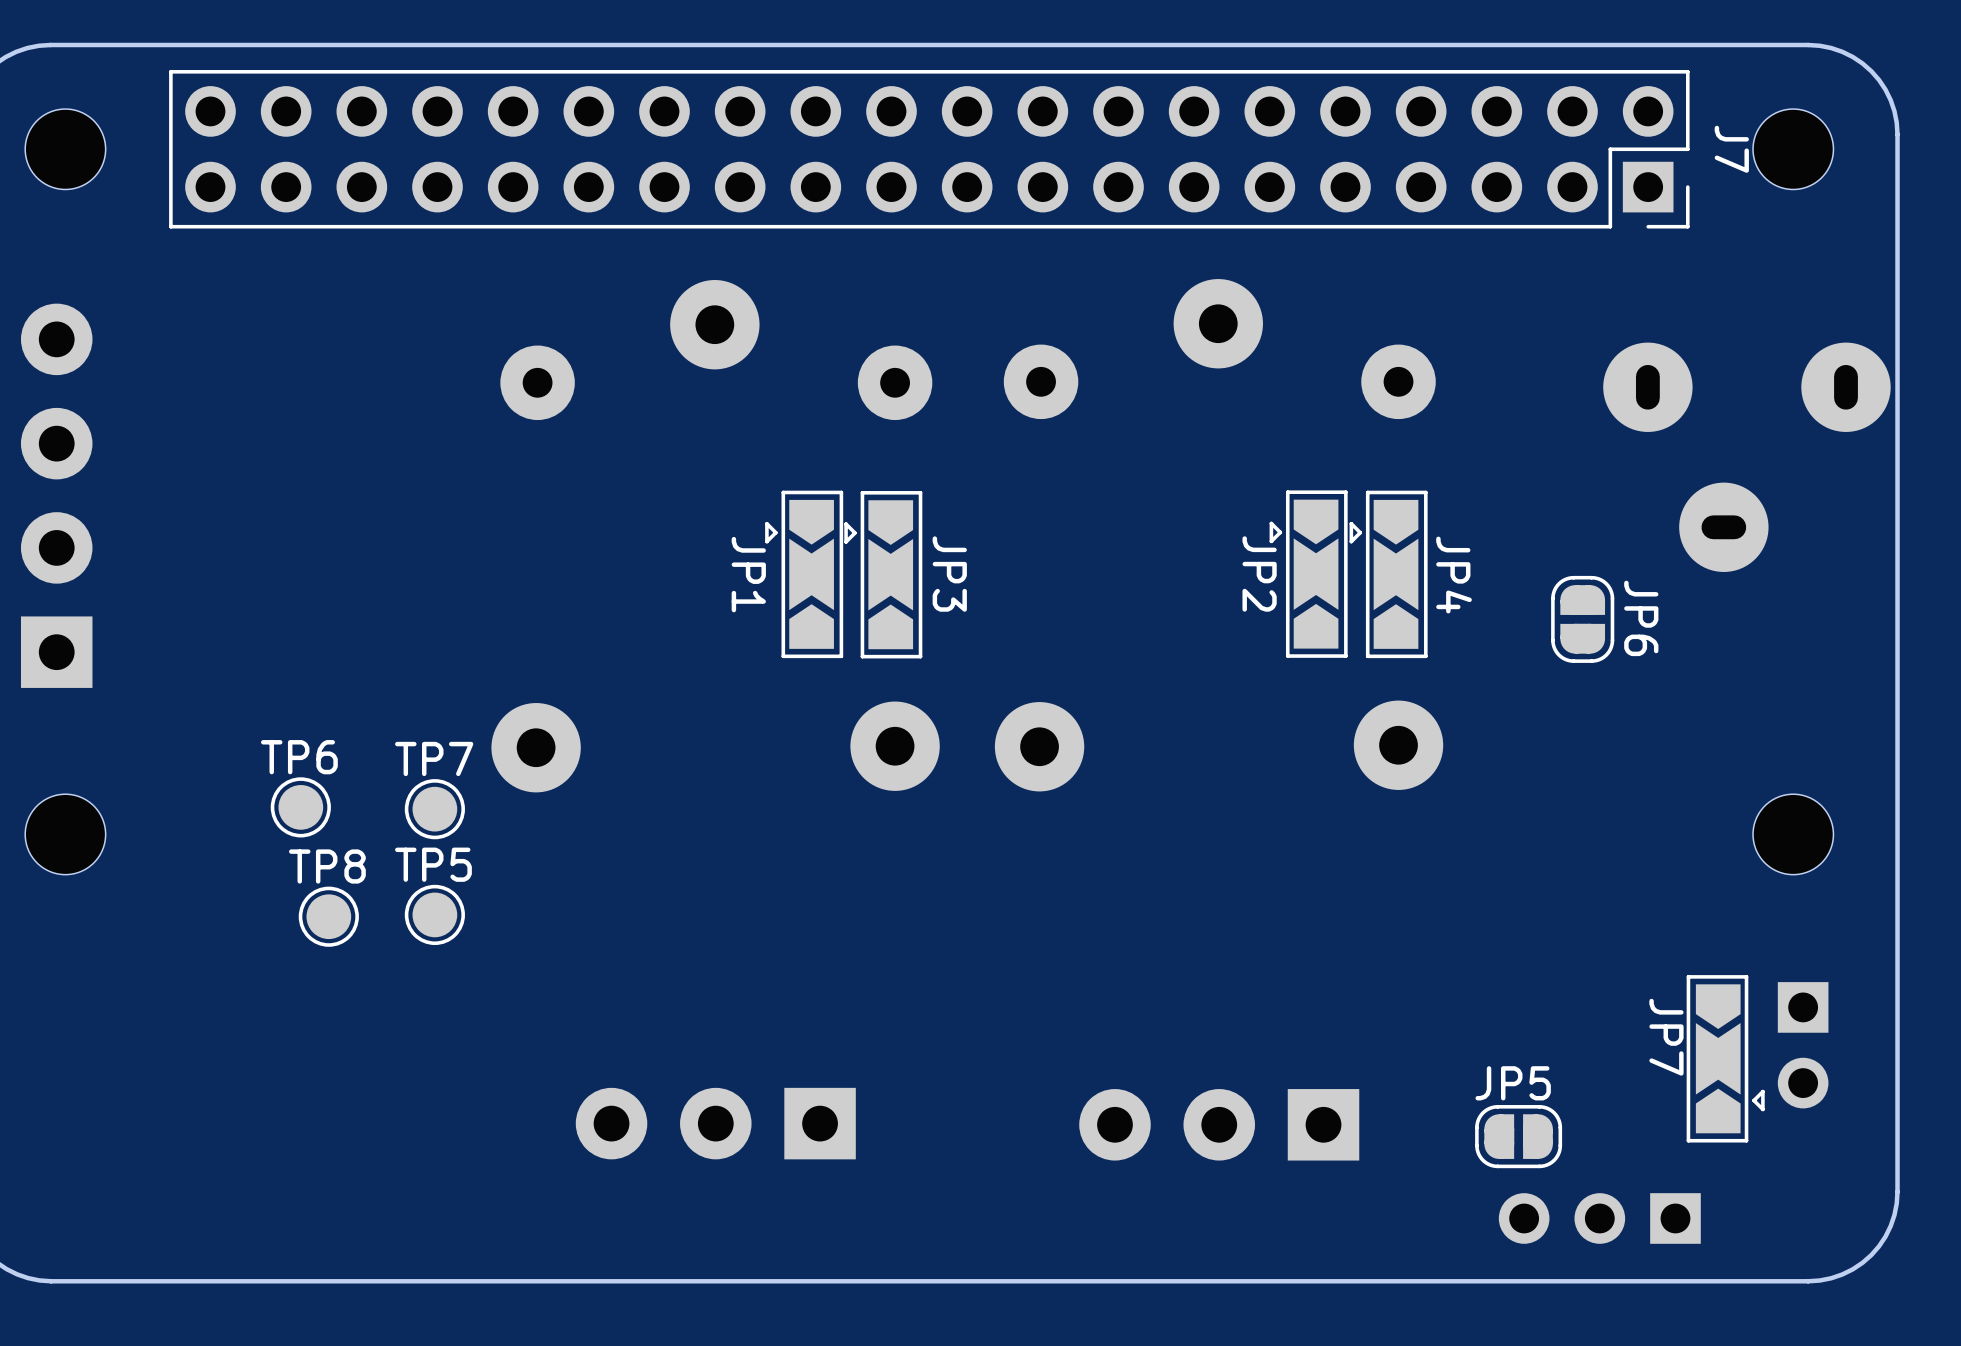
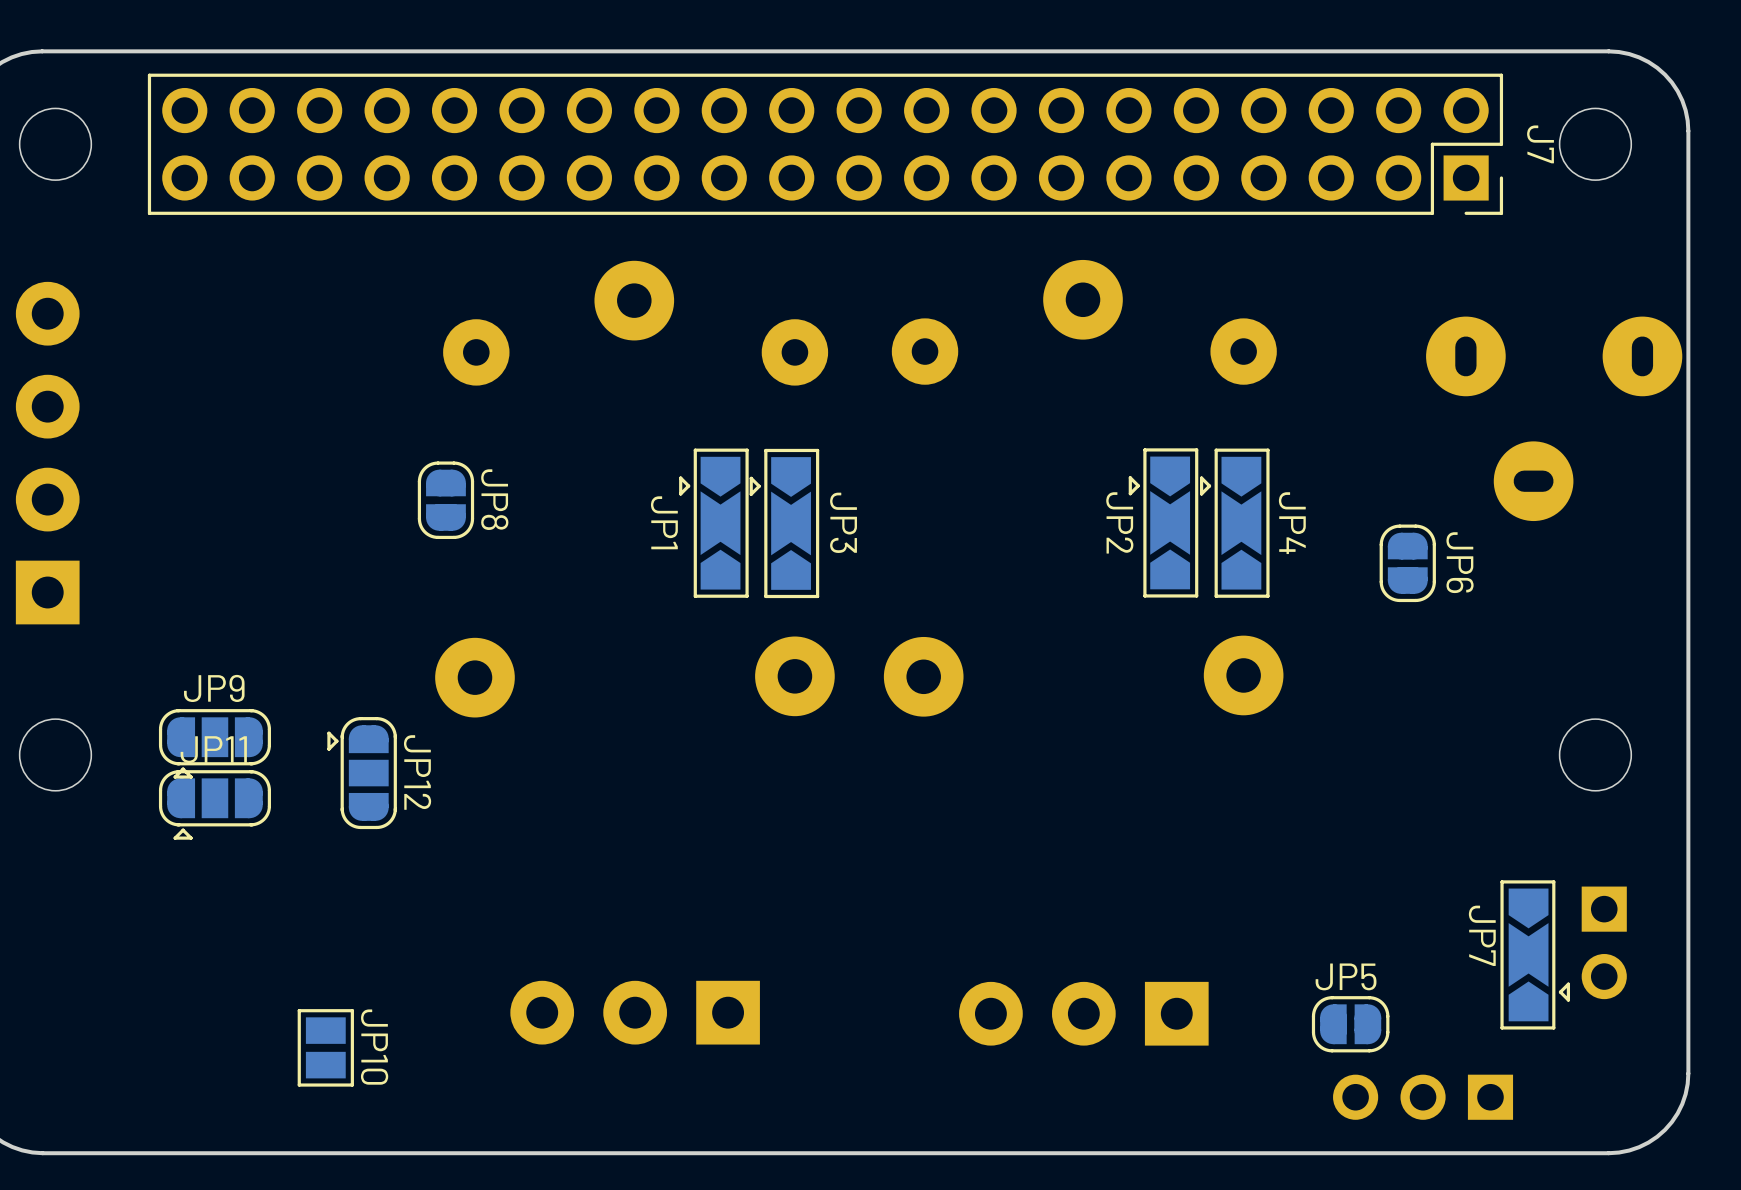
JP8: none -> (445, 500)
TP6: (300, 807) -> none
TP7: (434, 809) -> none
JP9: none -> (214, 743)
JP12: none -> (362, 773)
JP11: none -> (214, 804)
TP5: (434, 914) -> none
TP8: (328, 916) -> none
JP10: none -> (325, 1047)

